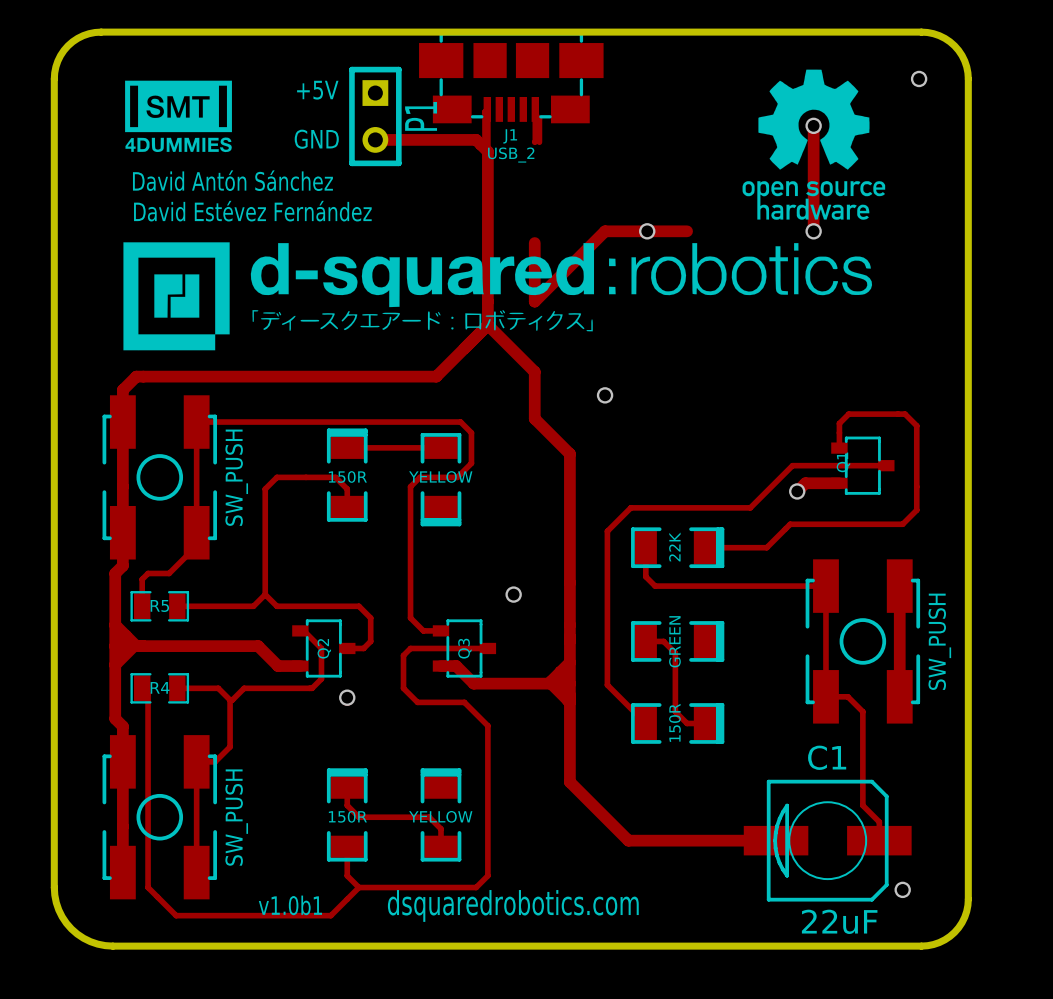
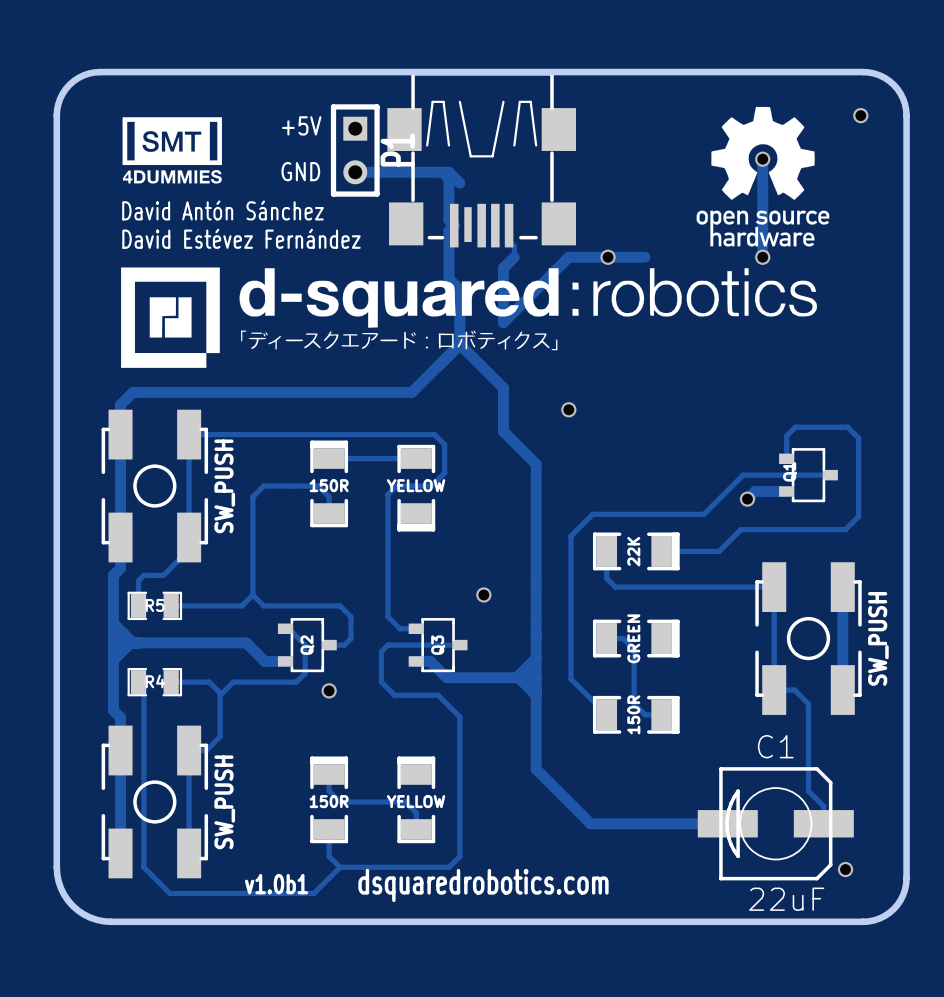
J1: USB_2 (511, 77) -> none
track: (535, 109) (534, 142) -> none
track: (535, 114) (539, 118) (539, 142) -> none
part: none -> (481, 159)
track: (480, 144) (480, 146) (484, 141) (484, 111) (487, 109) (487, 266) -> (442, 172) (448, 178) (448, 220) (454, 225) (448, 230) (448, 279) (459, 289)
track: none -> (509, 225) (509, 241) (514, 246) (514, 257) (503, 268)

